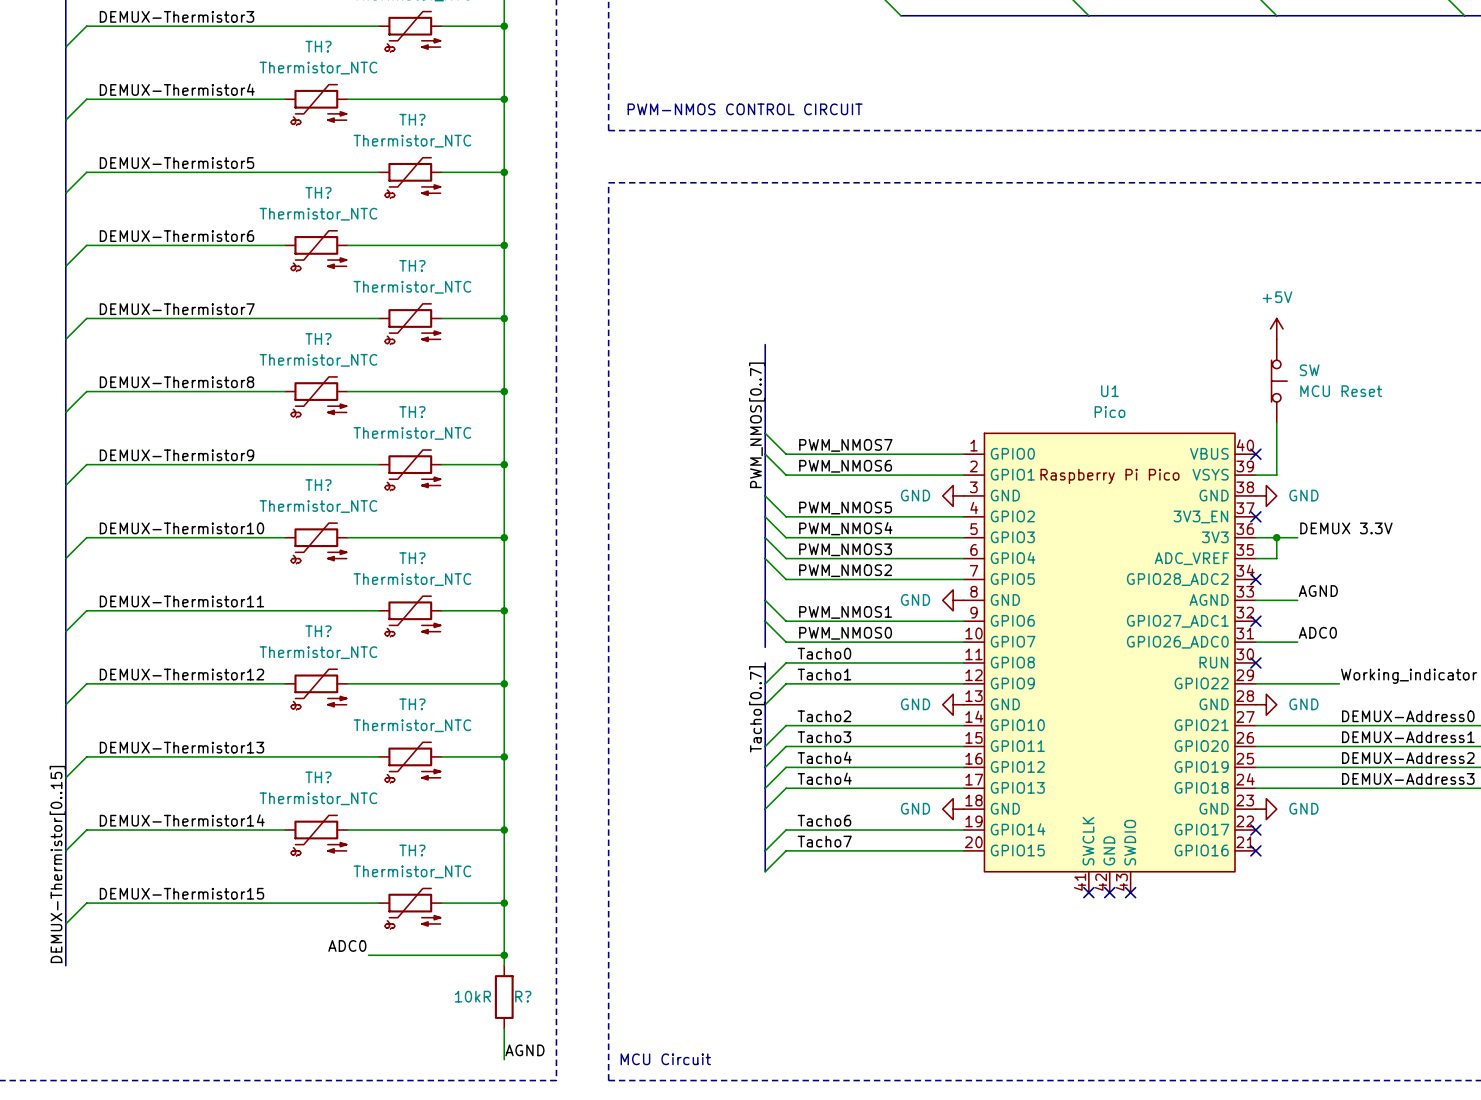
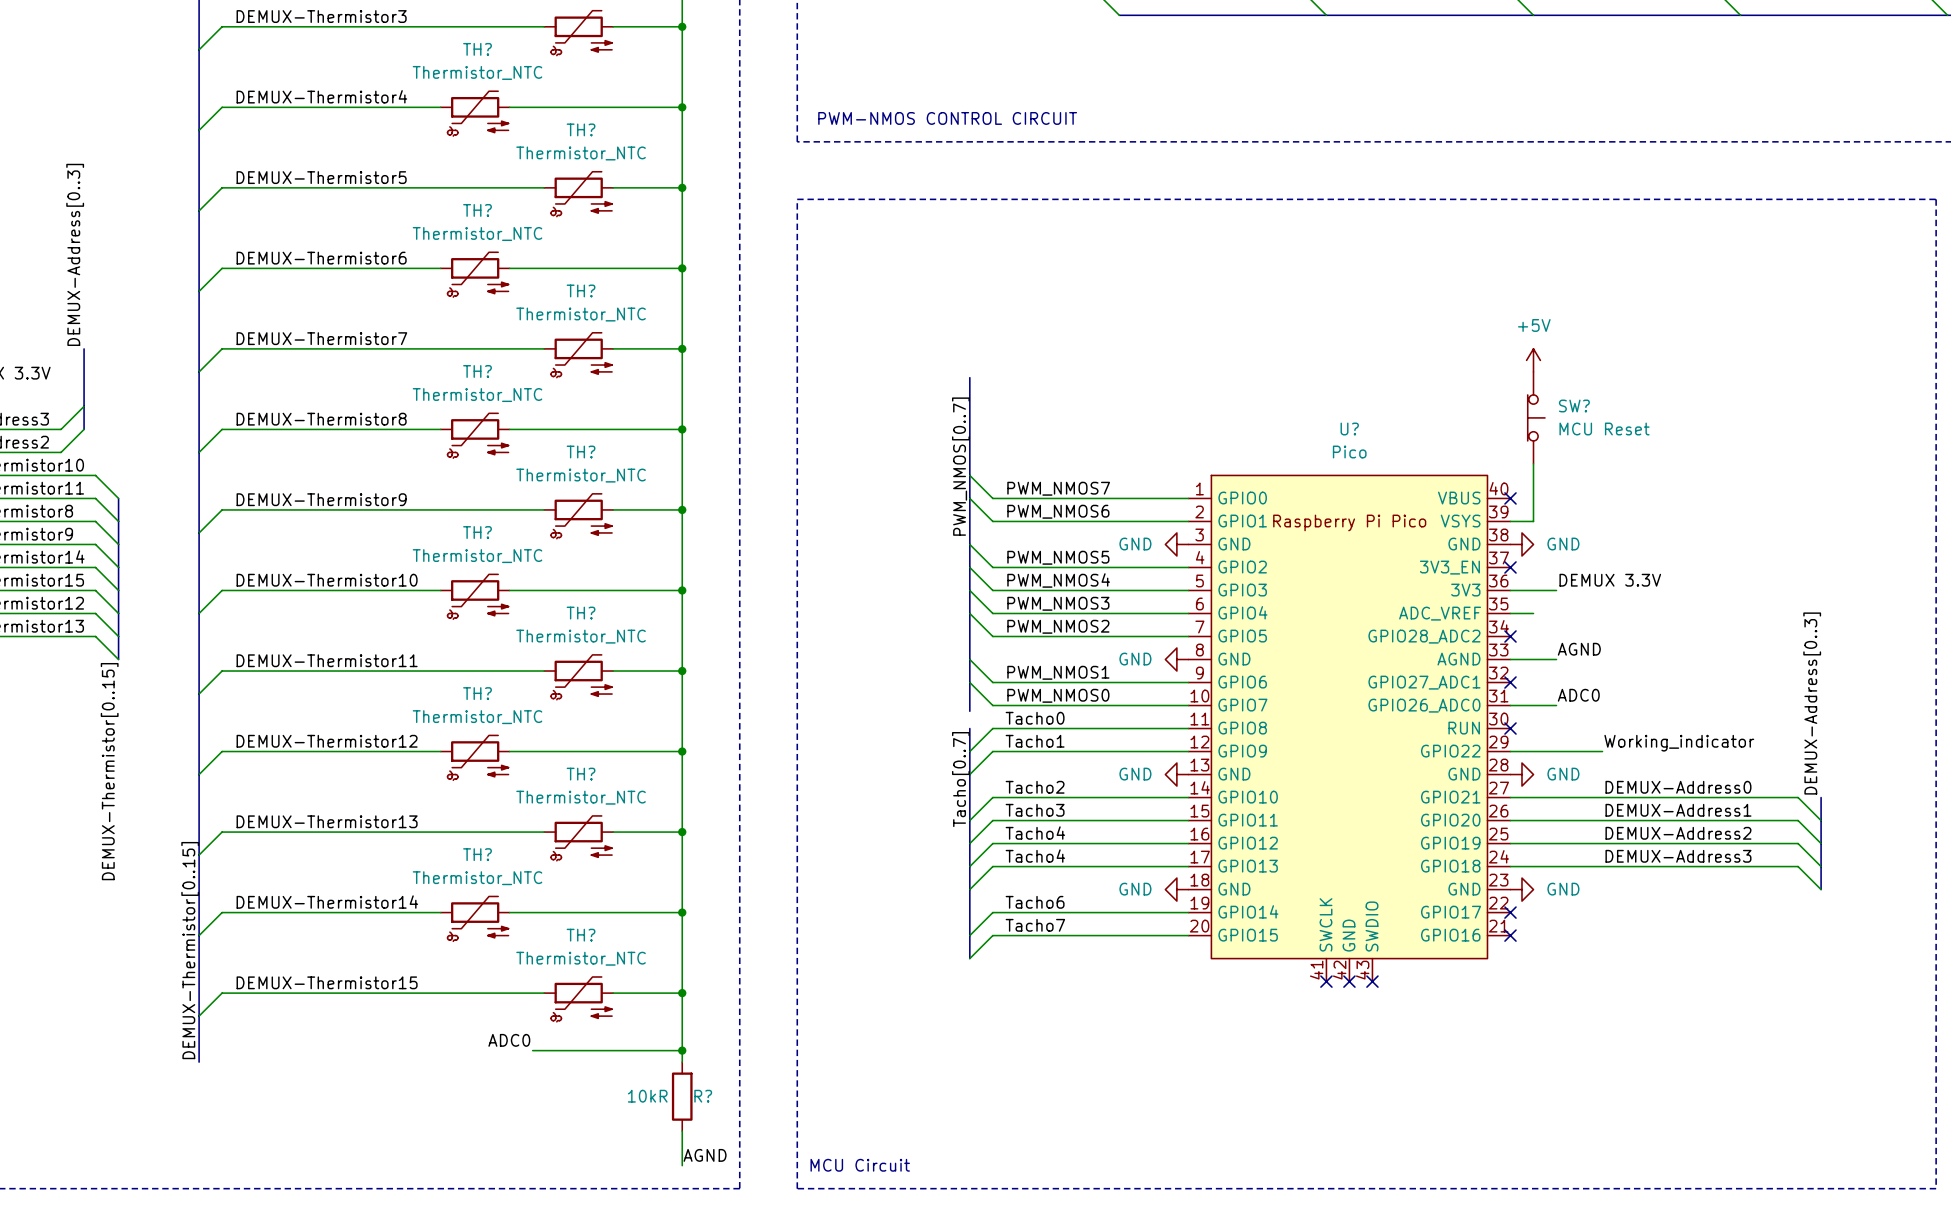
SW name: SW (1309, 370) -> SW? (1574, 406)
U1 name: U1 (1109, 391) -> U? (1349, 429)
wire: (1276, 537) (1276, 558) -> none
junction: (1276, 537) -> none

